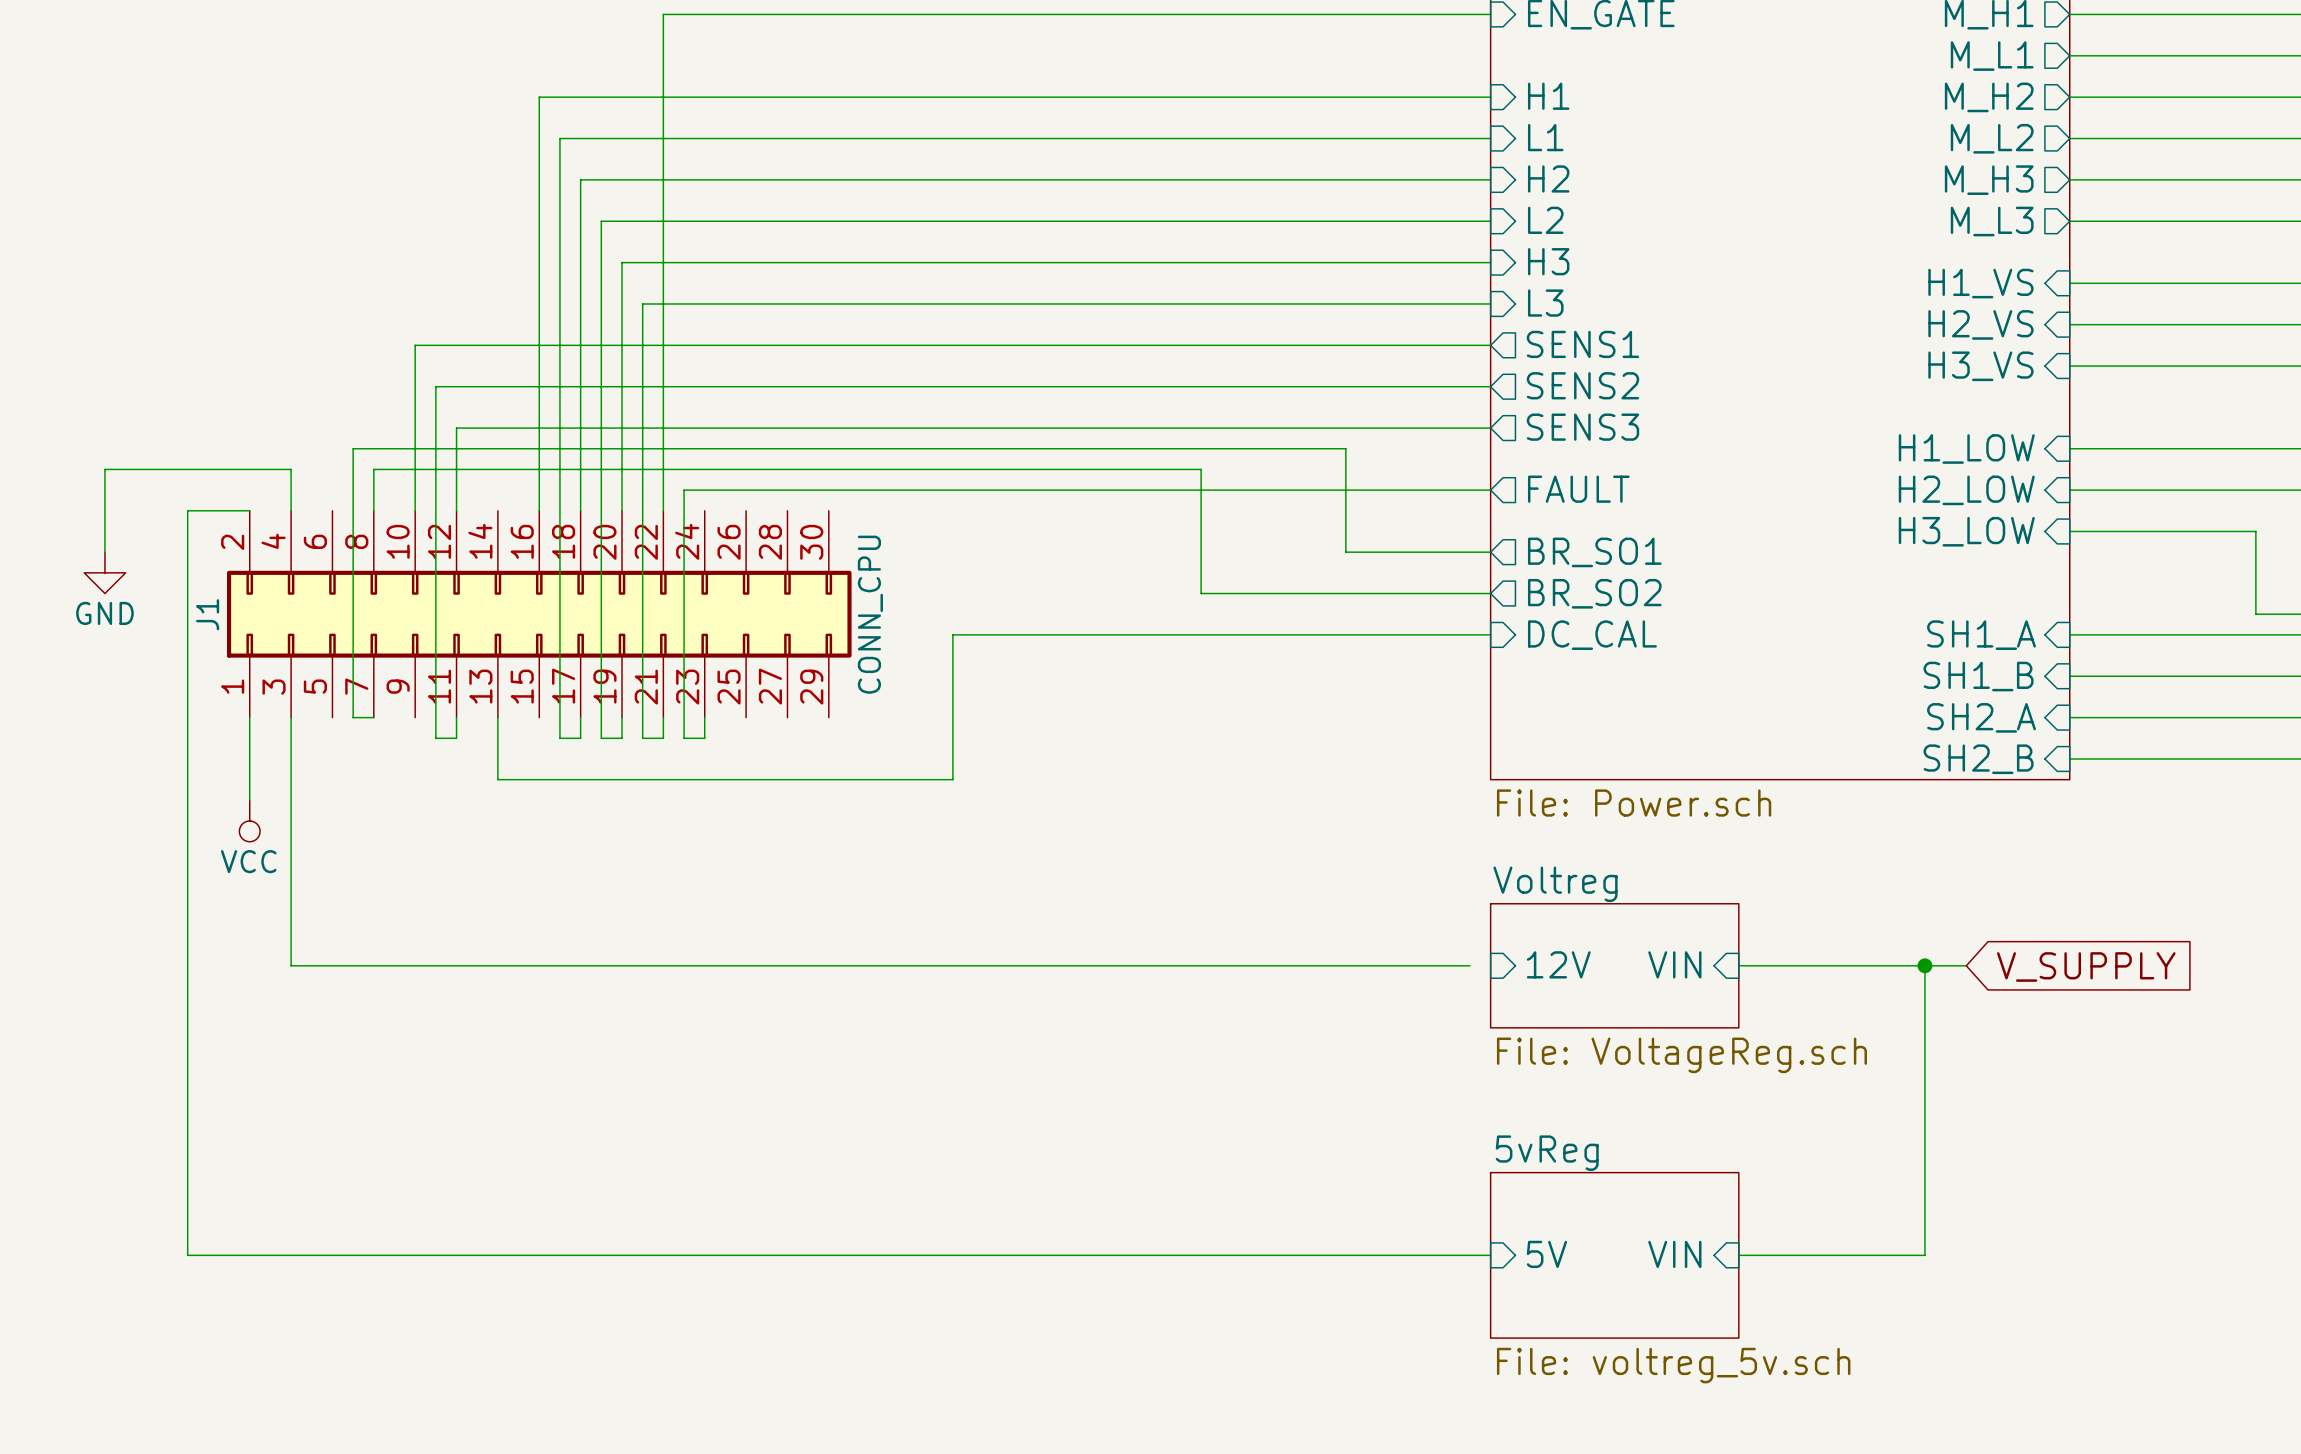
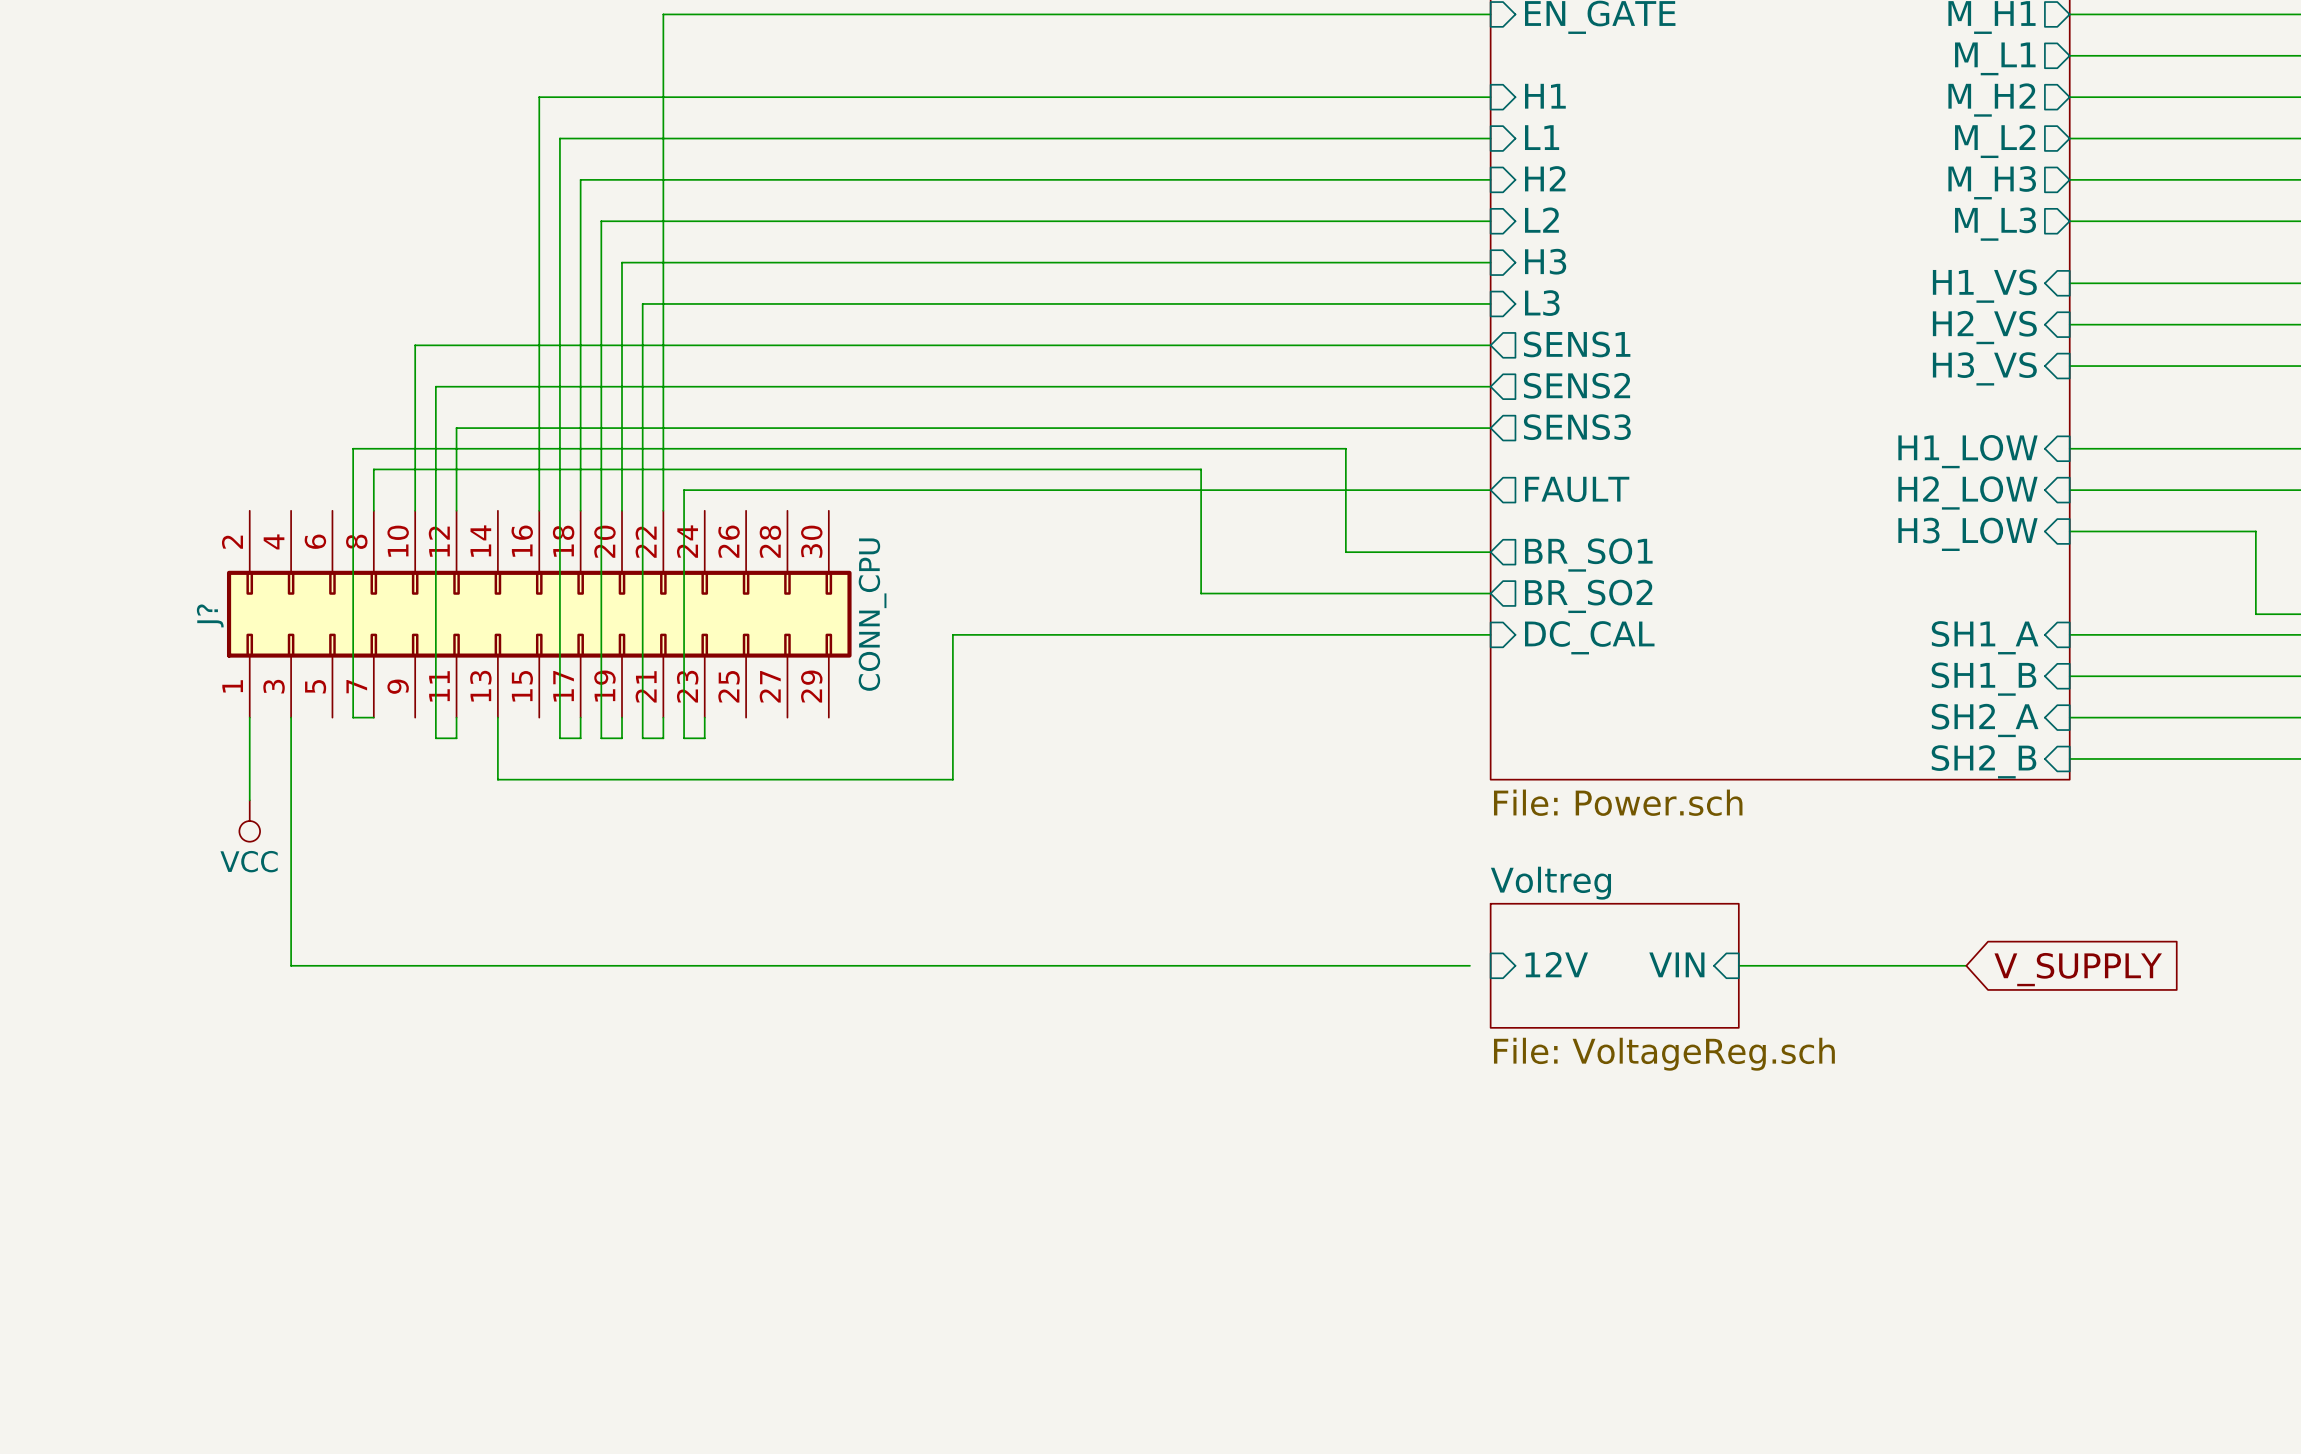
wire: (249, 510) (187, 510) (187, 1255) (1490, 1255) -> none
wire: (291, 510) (291, 469) (104, 469) (104, 552) -> none
power symbol: GND (104, 572) -> none
J1 name: J1 (207, 614) -> J? (210, 615)
wire: (1924, 965) (1924, 1255) (1738, 1255) -> none
junction: (1924, 965) -> none
sheet pin: 5V (1546, 1254) -> none
sheet pin: VIN (1674, 1254) -> none
sheet 5vReg: File: voltreg_5v.sch (1614, 1255) -> none

